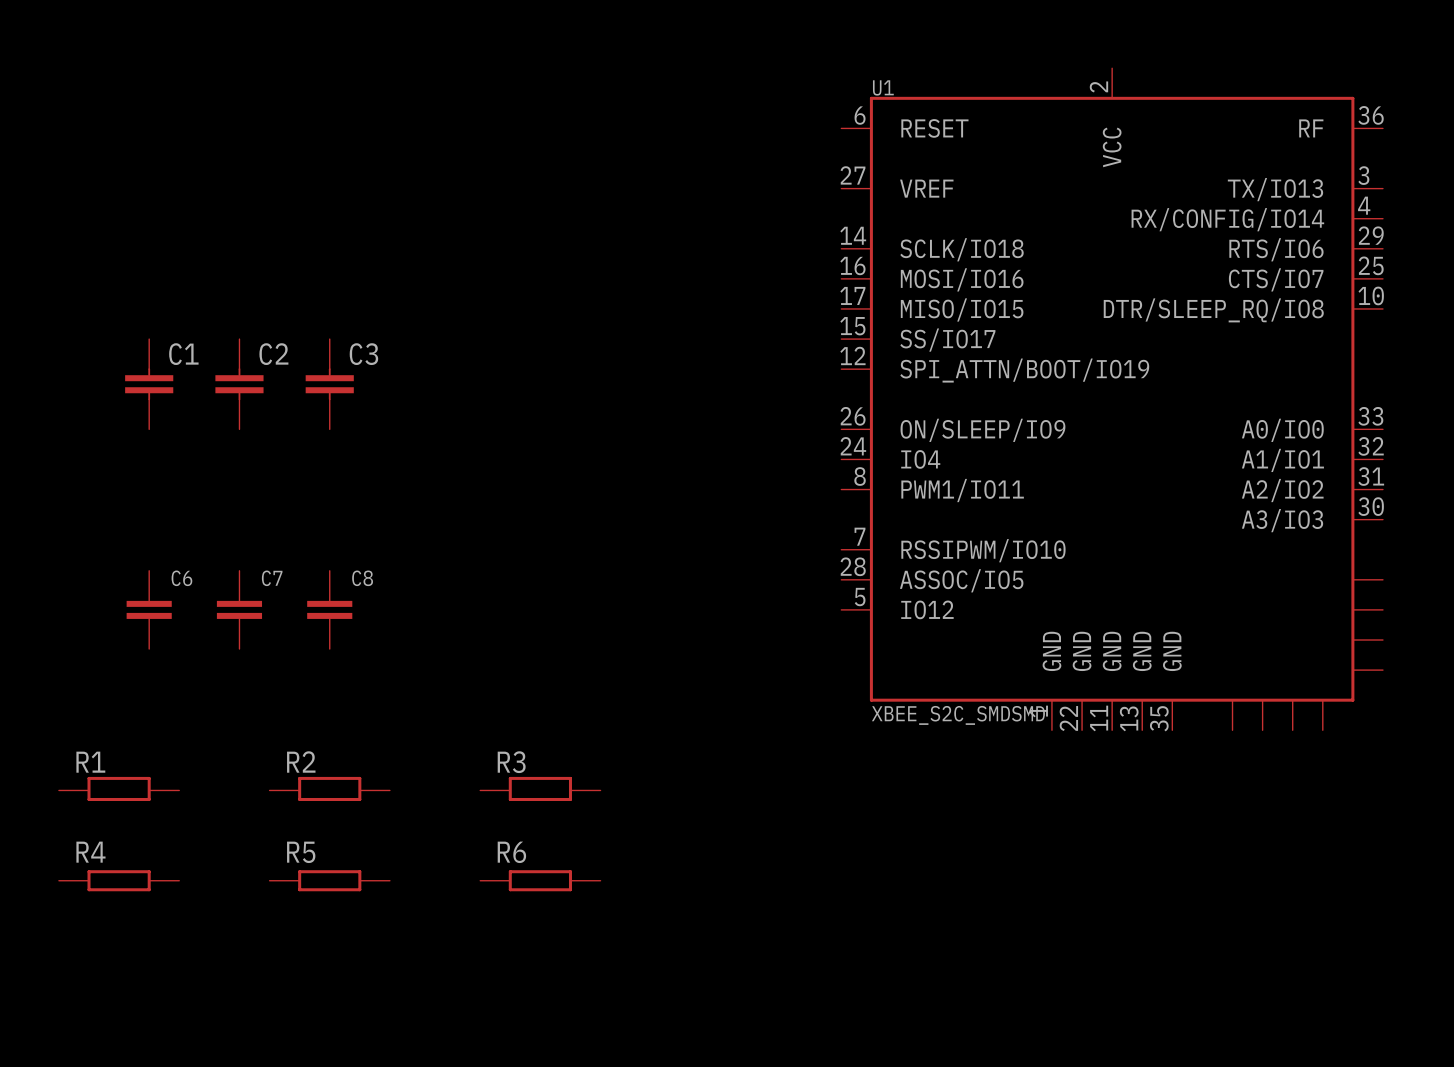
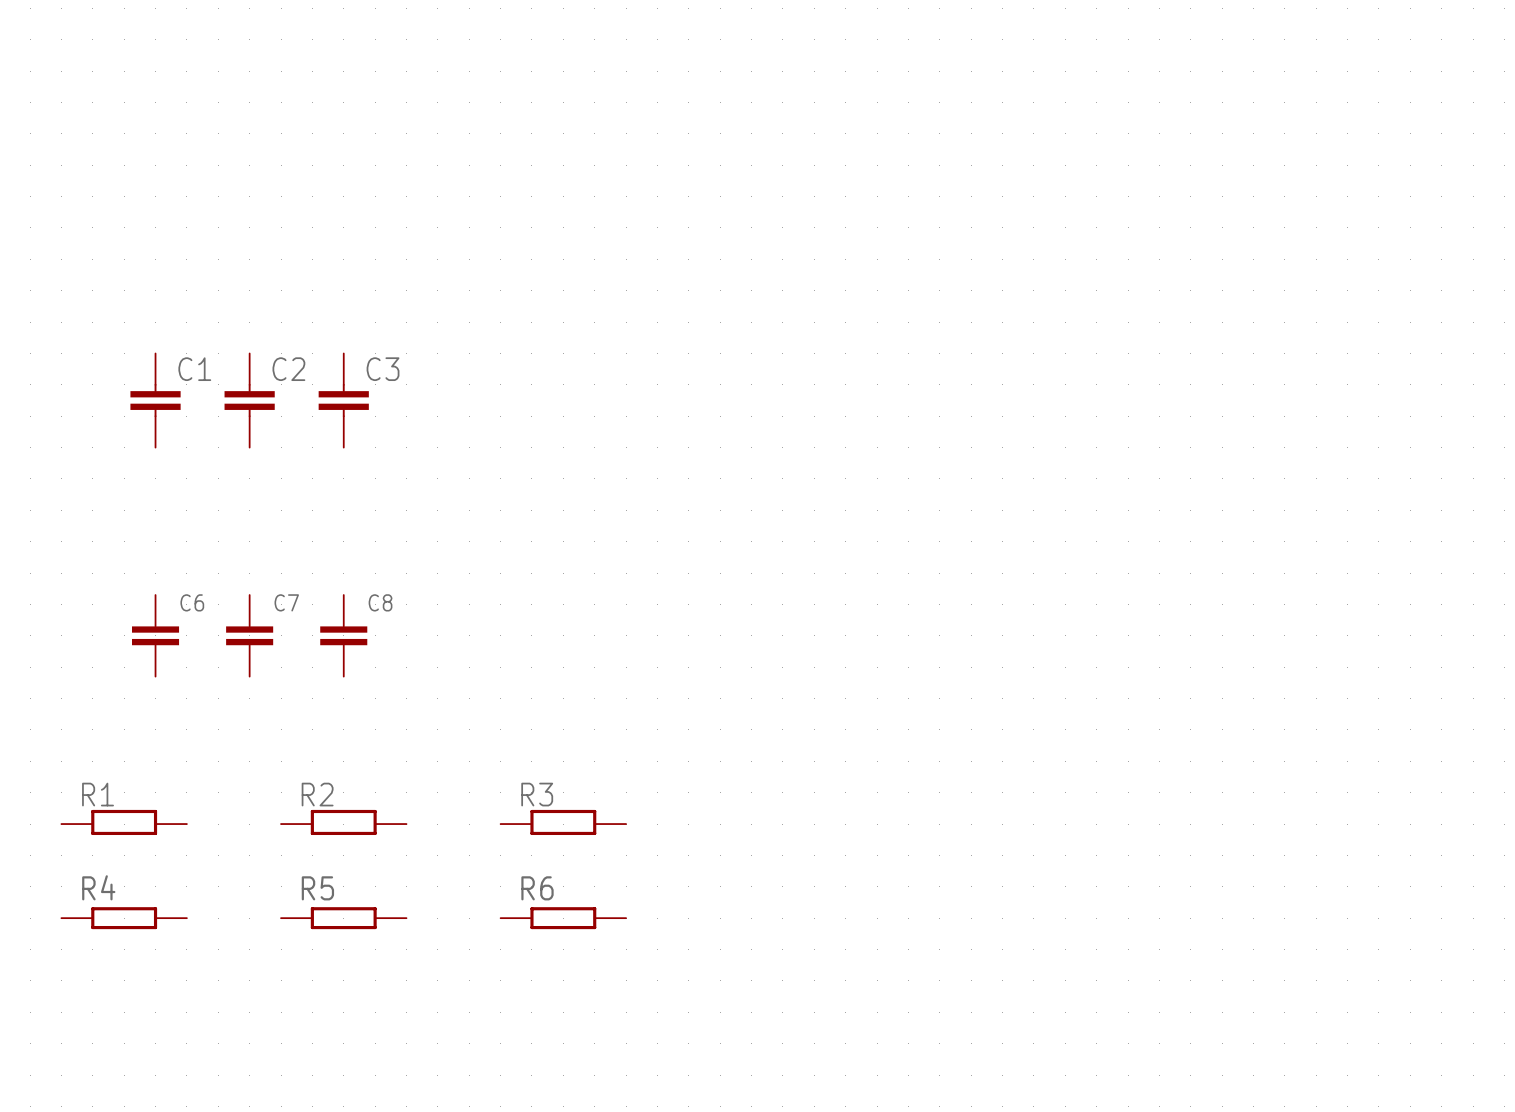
U1: XBEE_S2C_SMDSMD (1112, 399) -> none

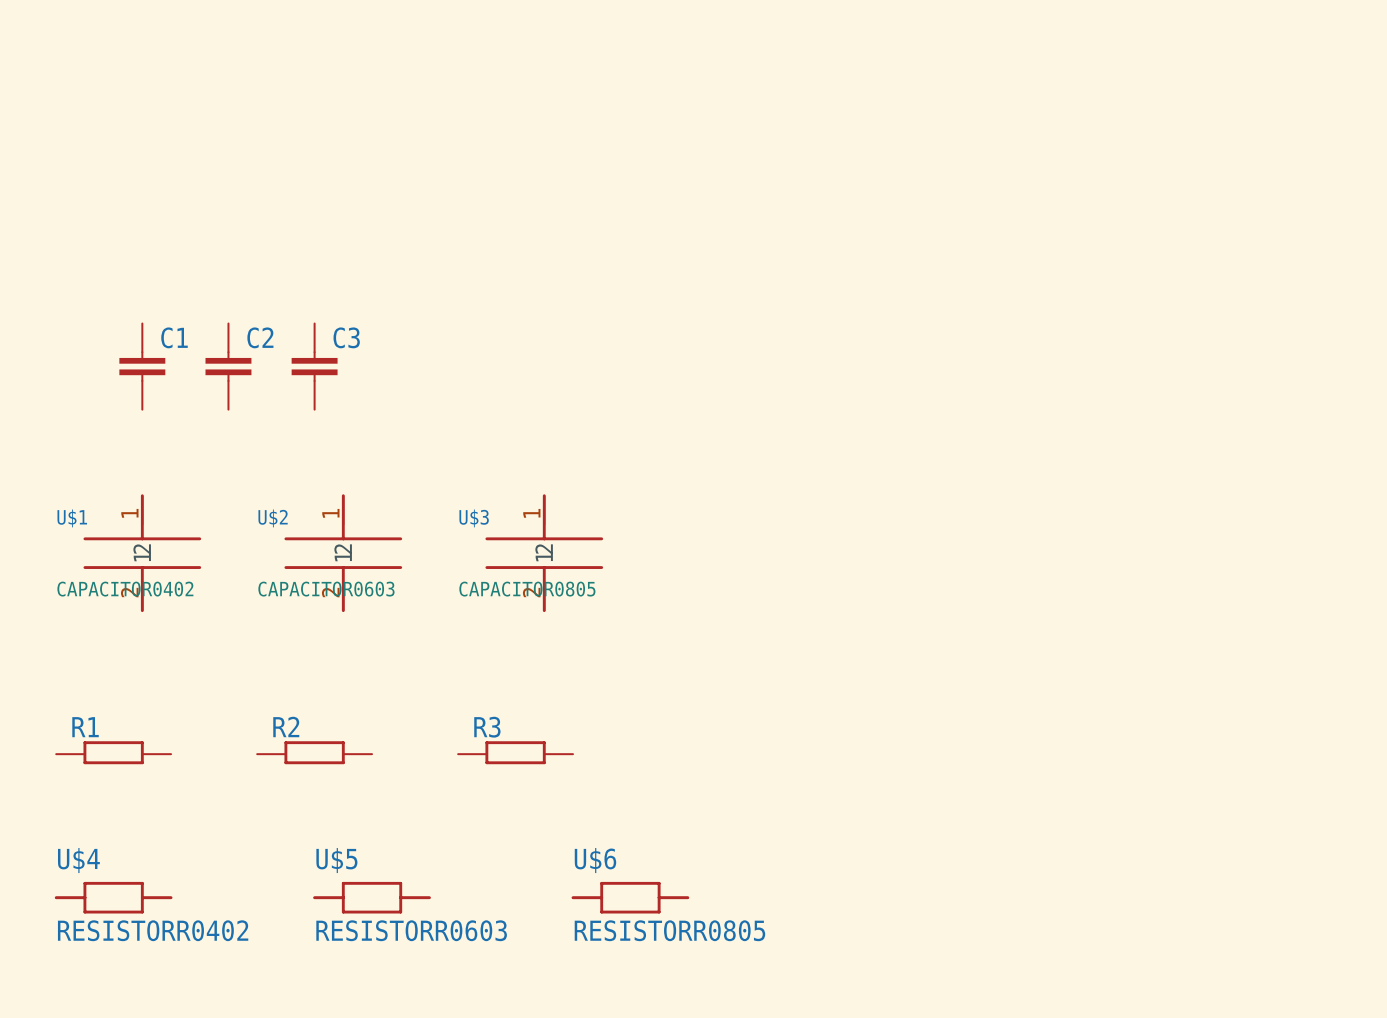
U$1: none -> CAPACITOR0402 (142, 553)
U$2: none -> CAPACITOR0603 (343, 553)
U$3: none -> CAPACITOR0805 (544, 553)
C6: (155, 635) -> none
C7: (249, 635) -> none
C8: (343, 635) -> none
R4: (124, 918) -> none
R5: (343, 918) -> none
R6: (563, 918) -> none
U$4: none -> RESISTORR0402 (113, 897)
U$5: none -> RESISTORR0603 (372, 897)
U$6: none -> RESISTORR0805 (630, 897)

